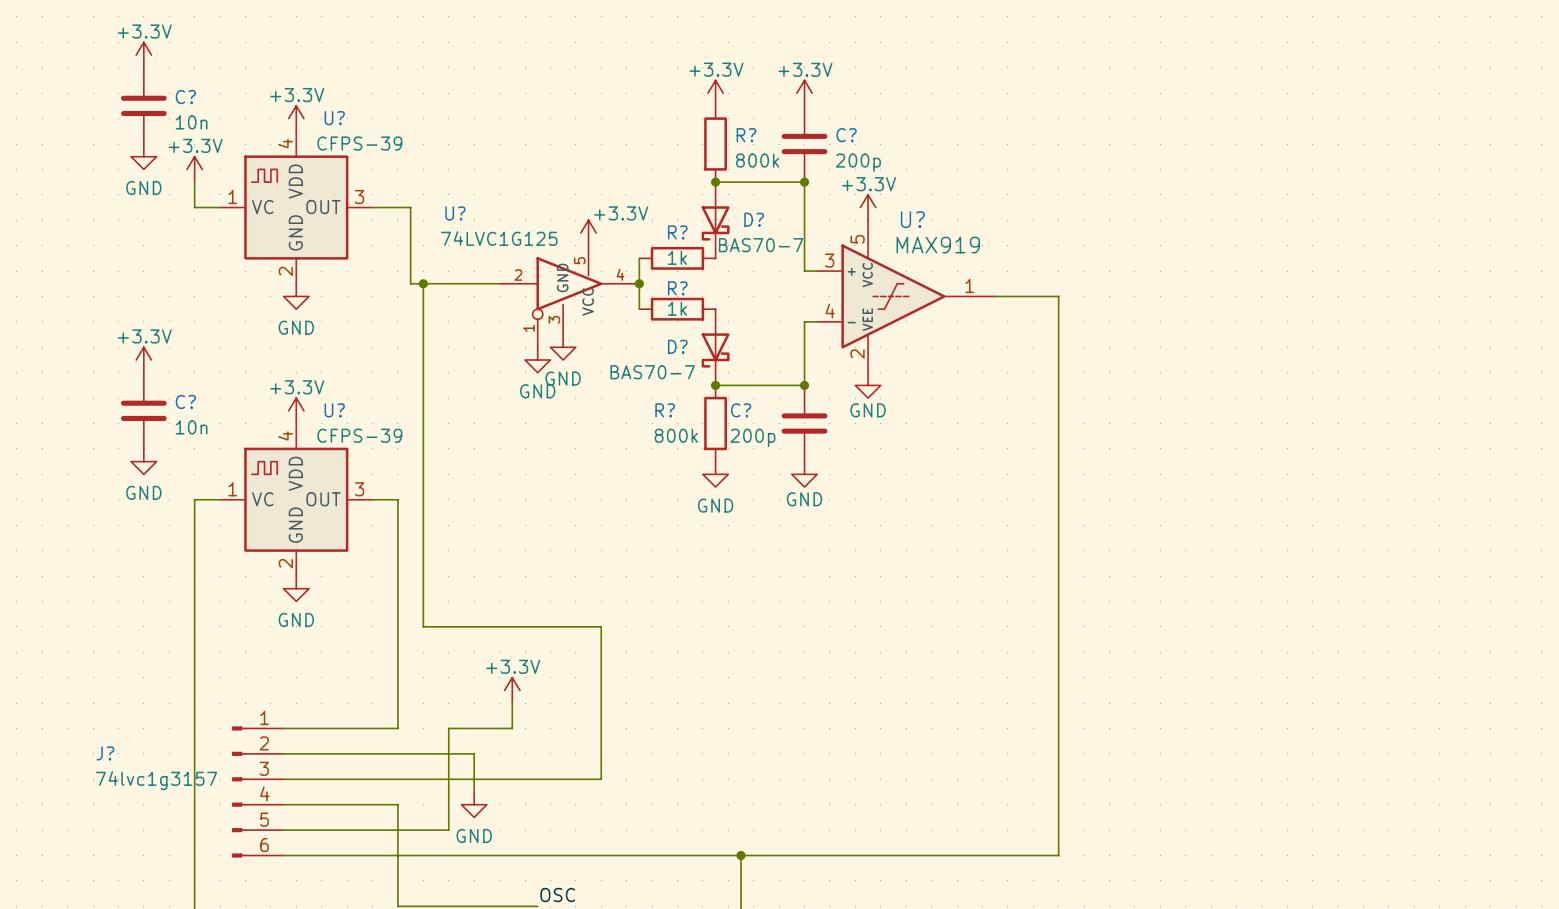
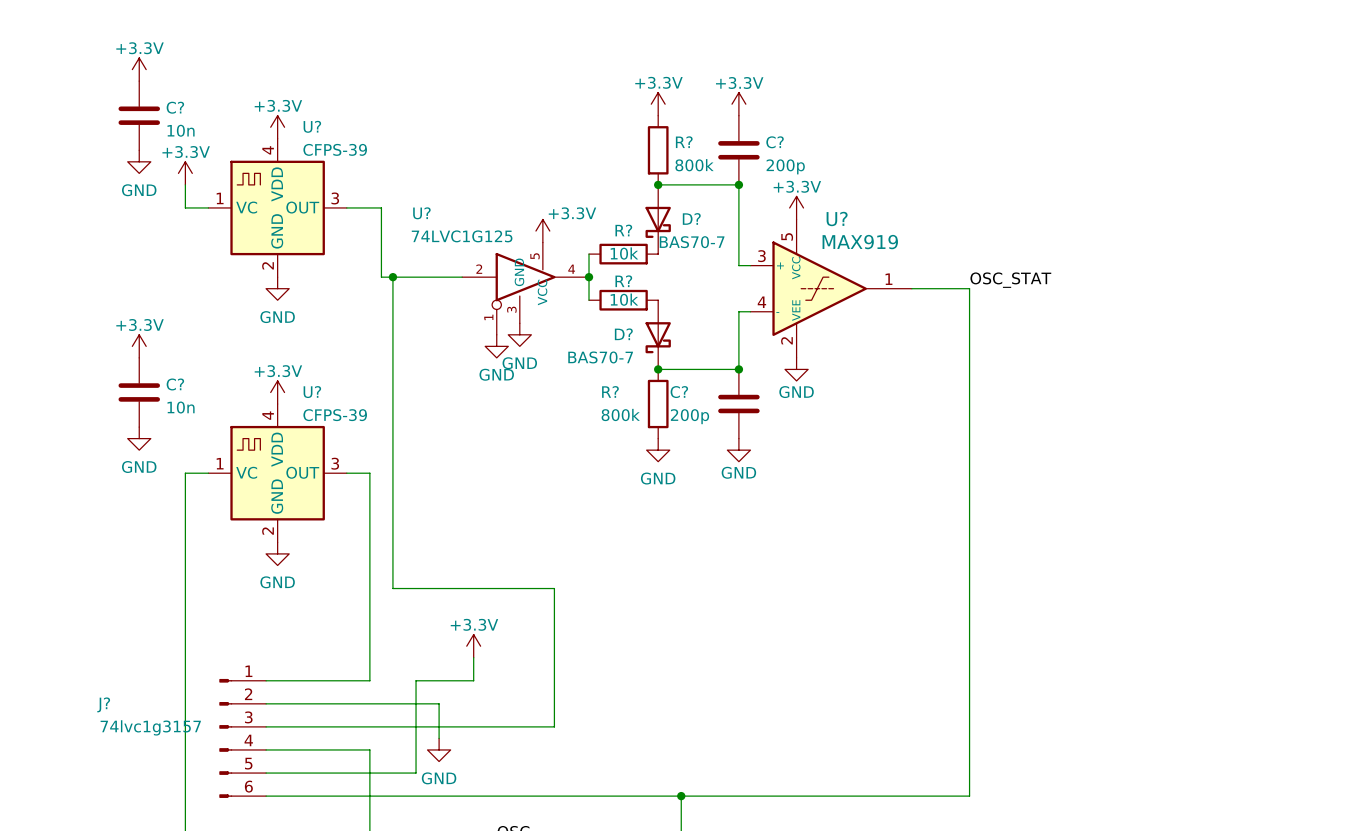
R? value: 1k (677, 257) -> 10k (624, 253)
label: none -> OSC_STAT (1010, 280)
R? value: 1k (677, 308) -> 10k (624, 299)

